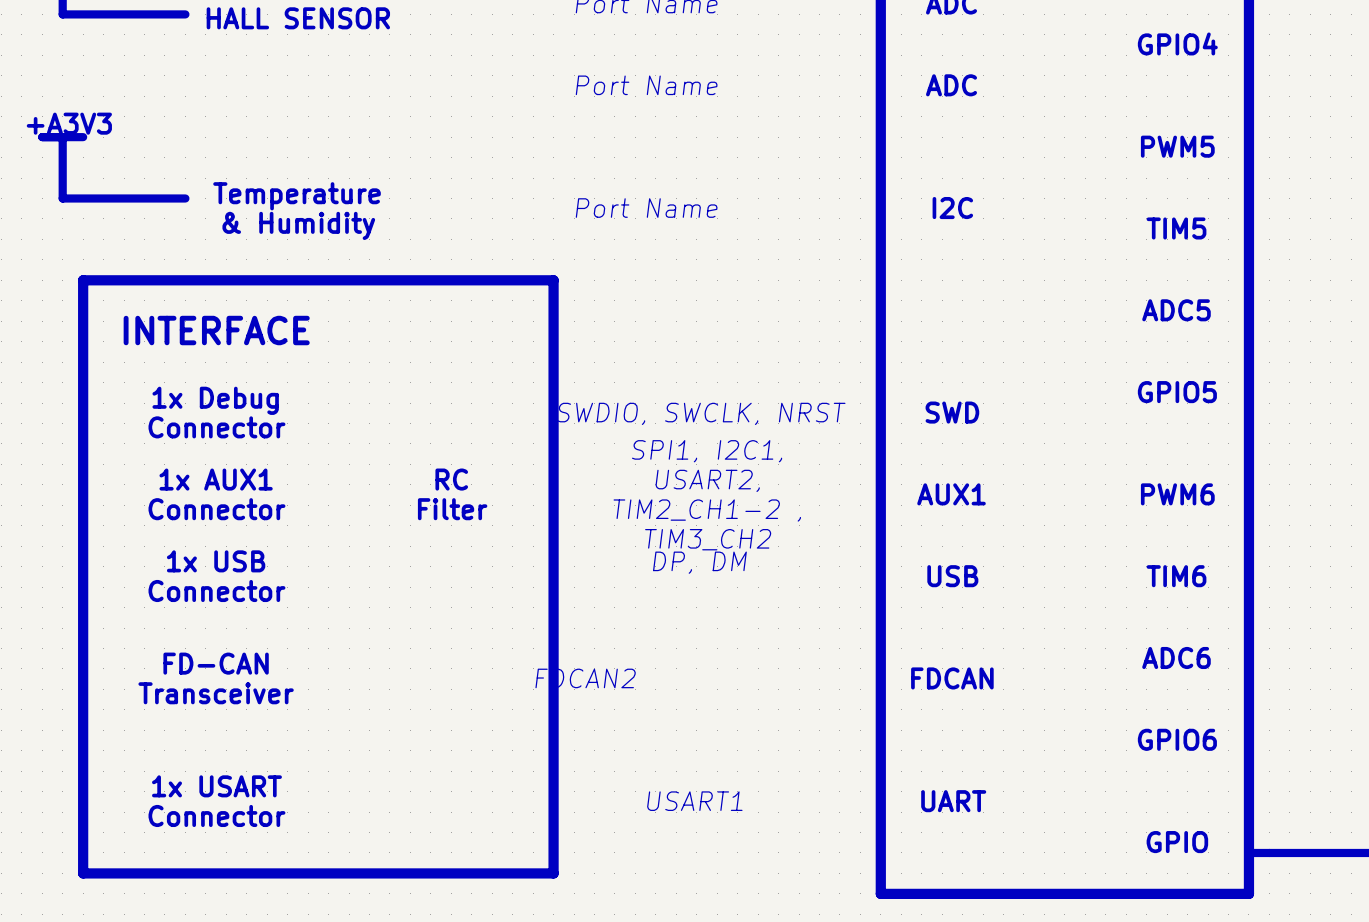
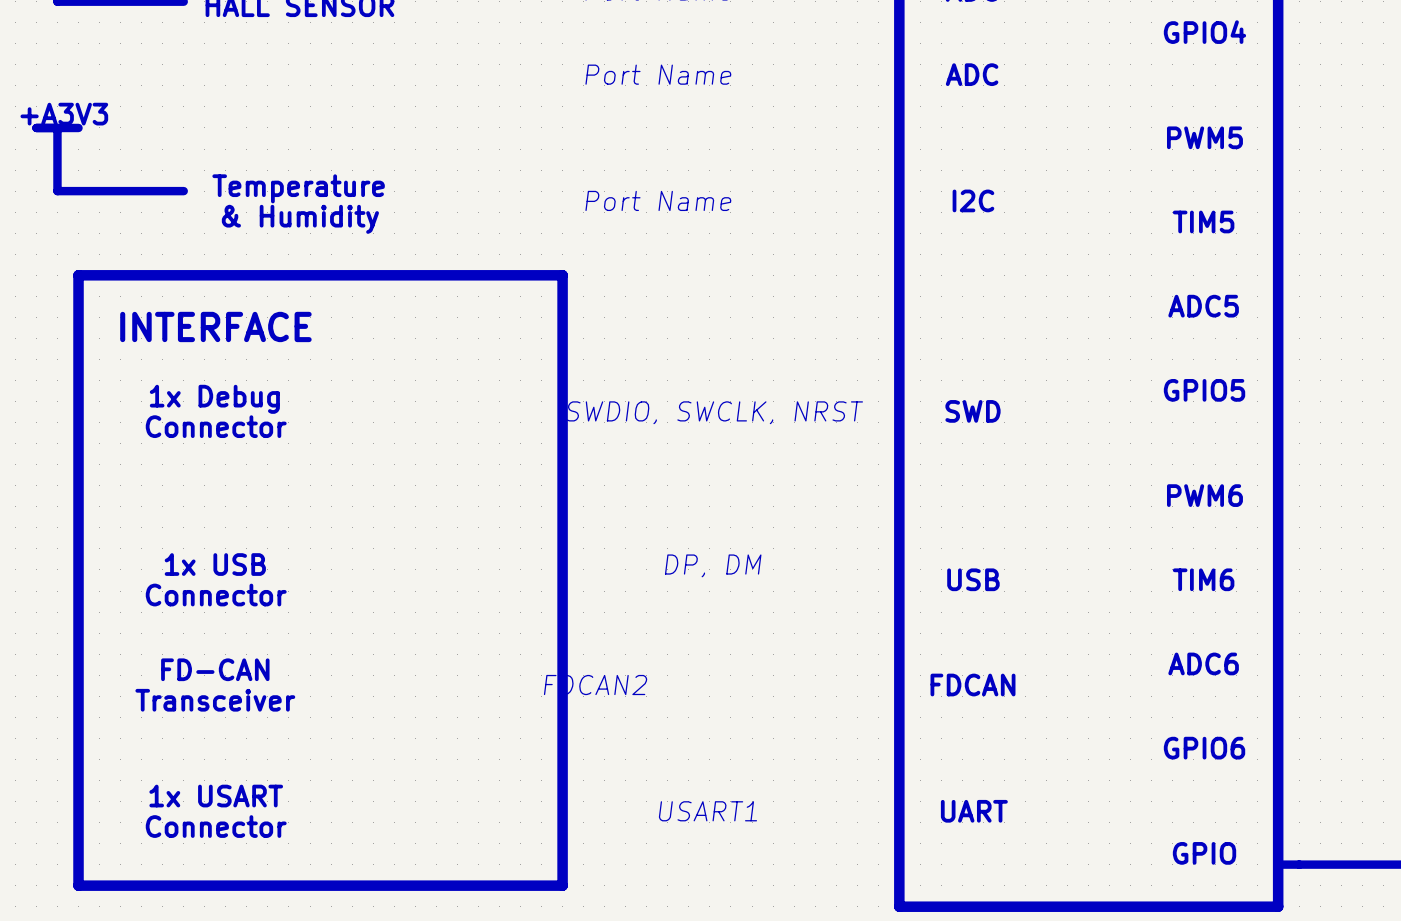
text: SPI1, I2C1, (707, 451) -> none
text: 1x AUX1 (216, 479) -> none
text: RC (451, 479) -> none
text: USART2, (707, 480) -> none
text: AUX1 (951, 494) -> none
text: Connector (216, 509) -> none
text: Filter (452, 509) -> none
text: TIM2_CH1-2 , (707, 510) -> none
text: TIM3_CH2 (708, 539) -> none

